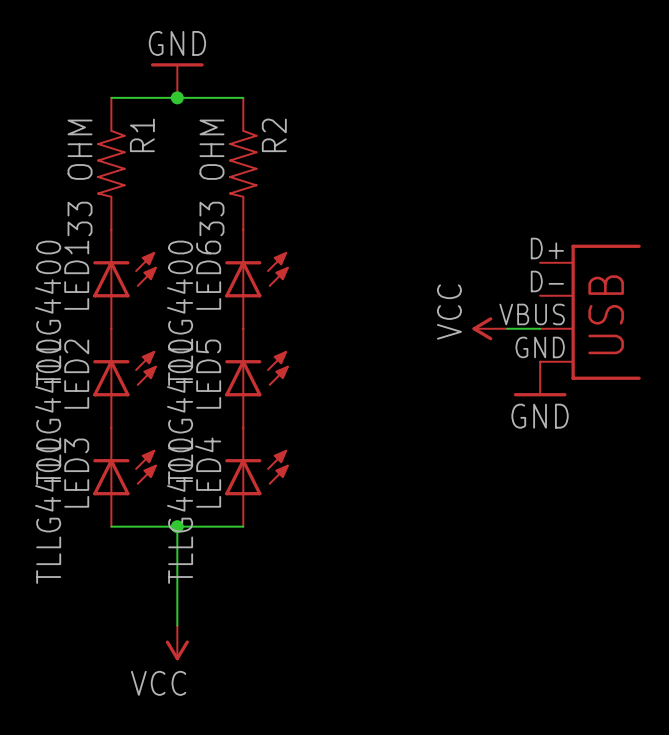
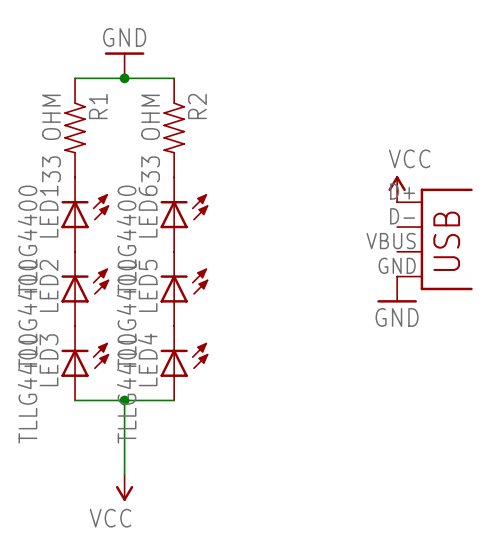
power symbol rotation: 0° (482, 328) -> 90° clockwise (397, 183)
power symbol position: VCC (489, 328) -> VCC (397, 189)
wire: (507, 328) (540, 328) -> none

